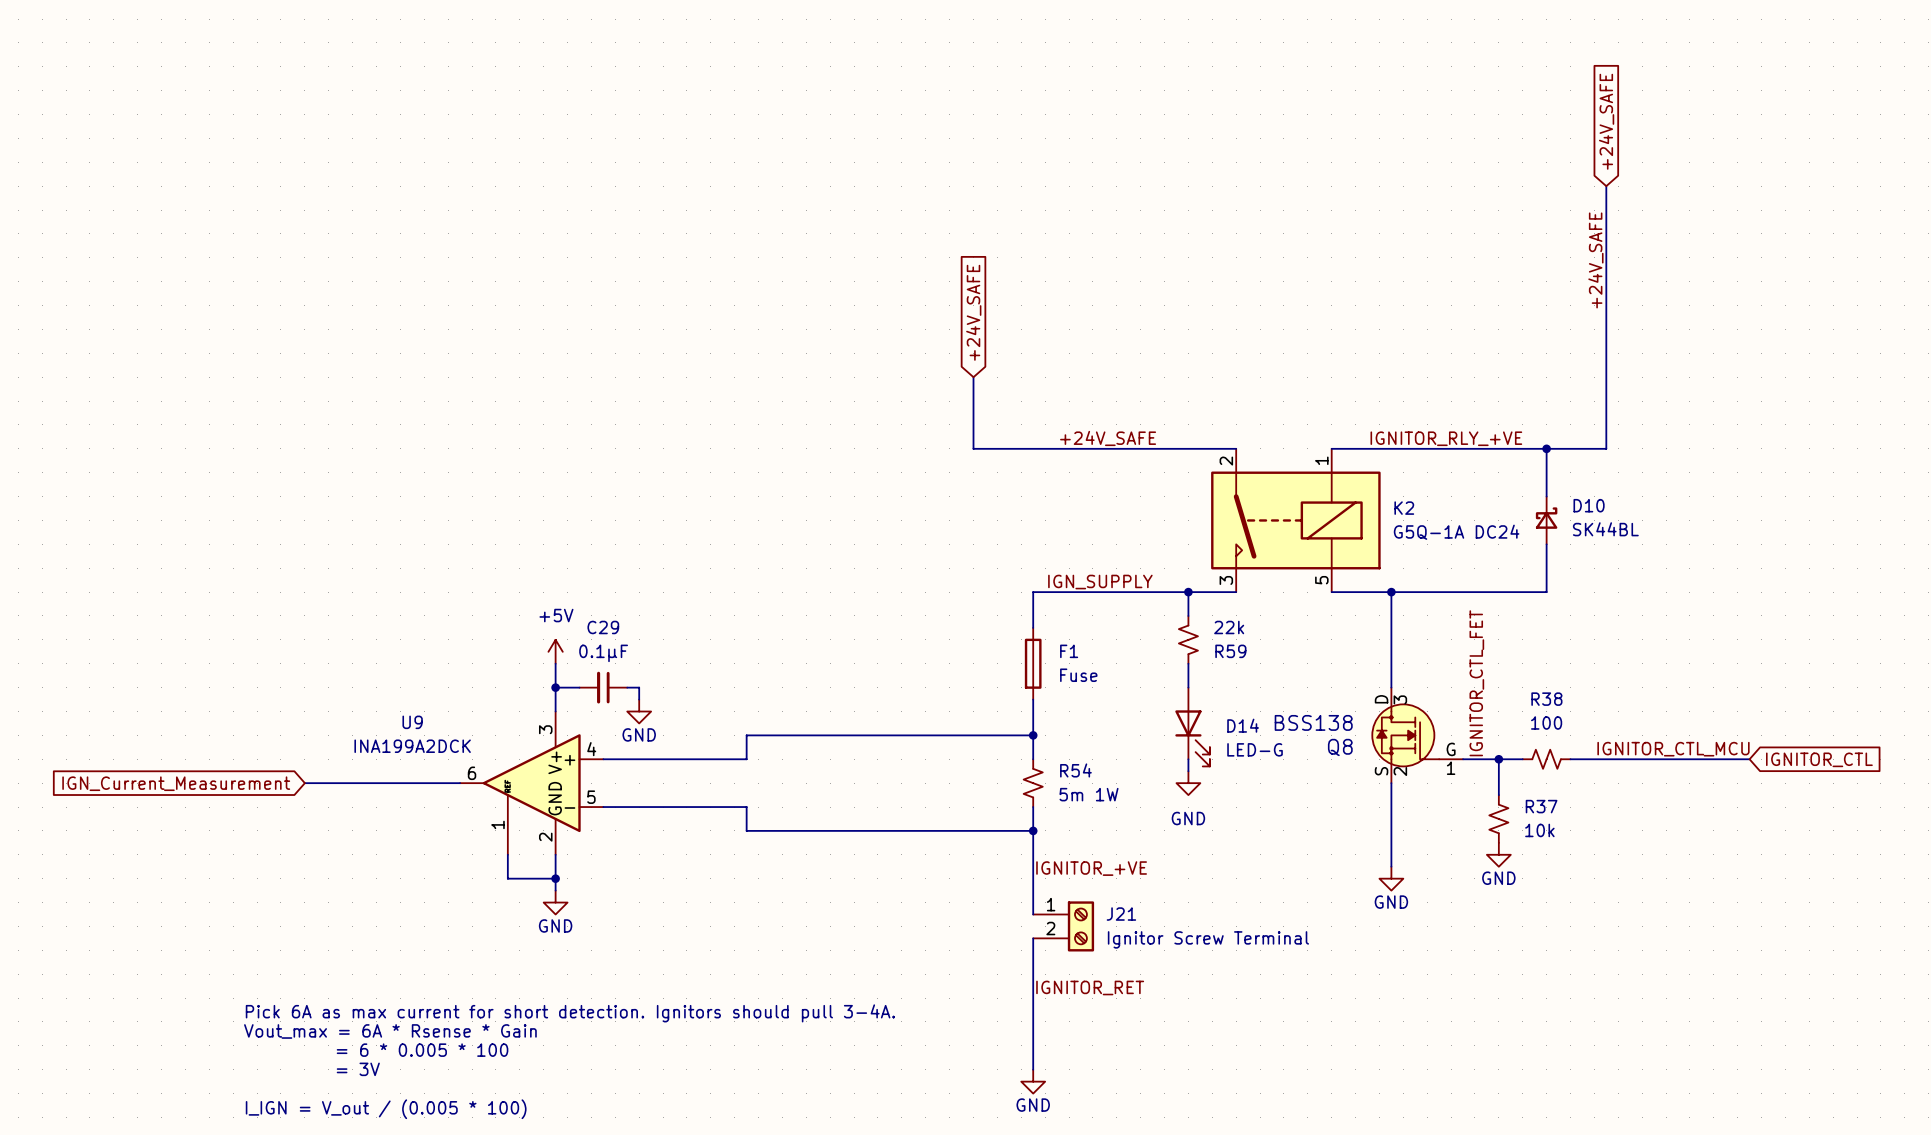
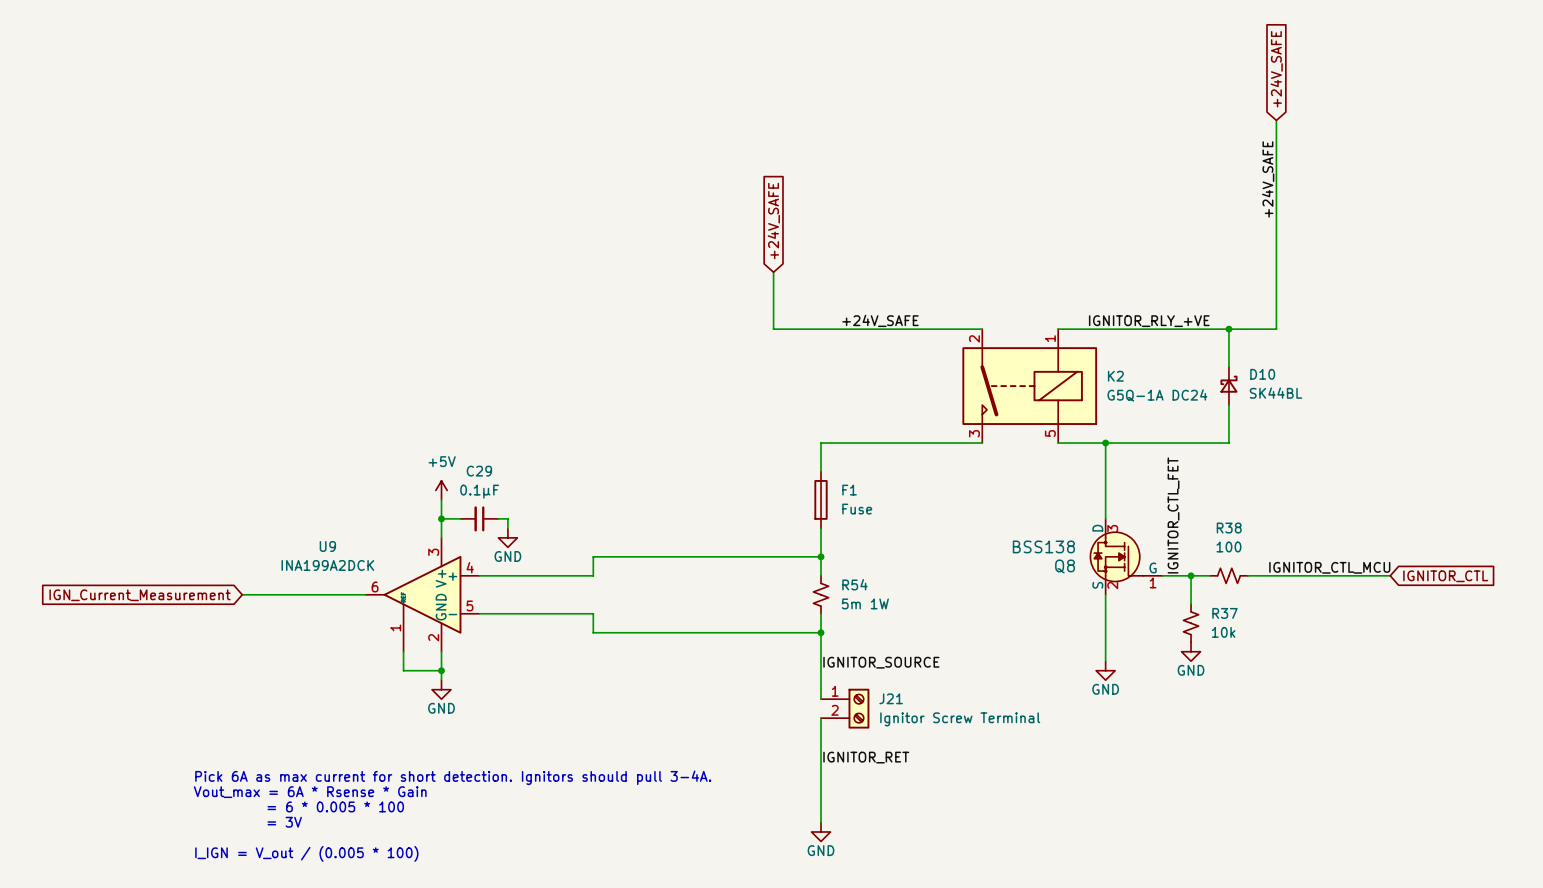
label: IGN_SUPPLY (1100, 582) -> none
wire: (1188, 592) (1188, 615) -> none
junction: (1188, 592) -> none
R59: 22k (1188, 639) -> none
wire: (1188, 663) (1188, 687) -> none
D14: LED-G (1192, 727) -> none
wire: (1188, 759) (1188, 771) -> none
power symbol: GND (1188, 783) -> none
label: IGNITOR_+VE (1091, 868) -> IGNITOR_SOURCE (881, 662)

